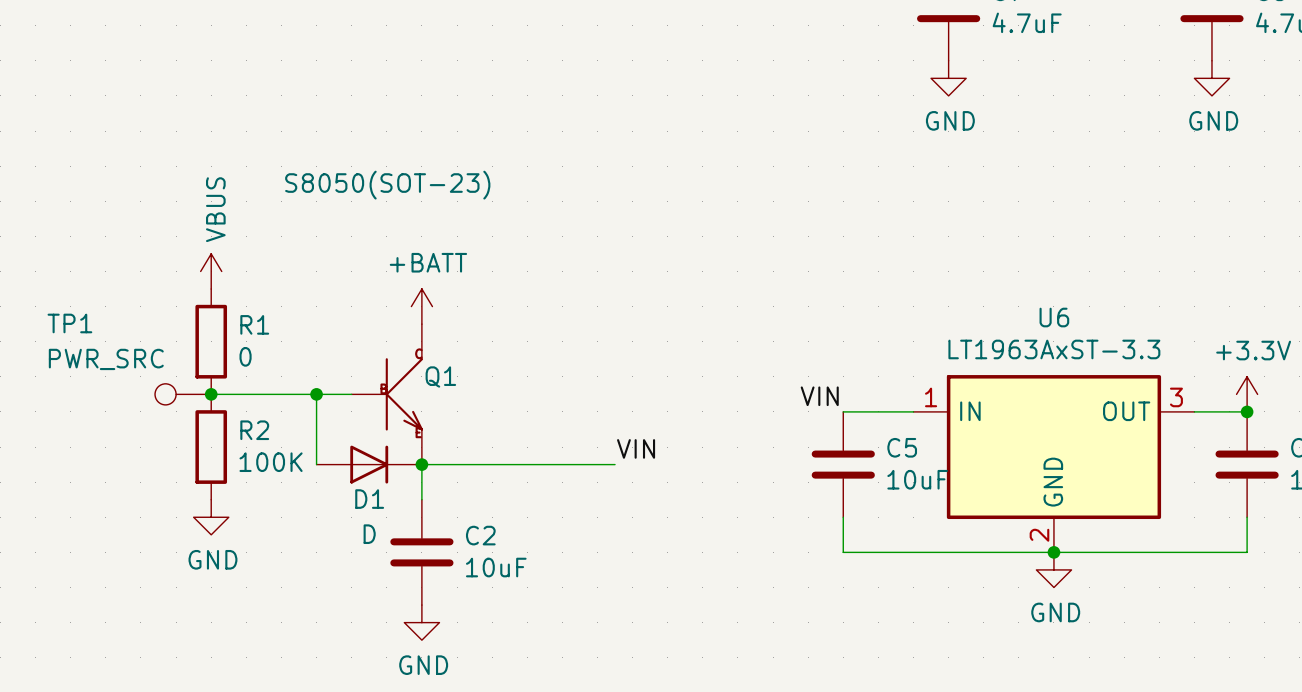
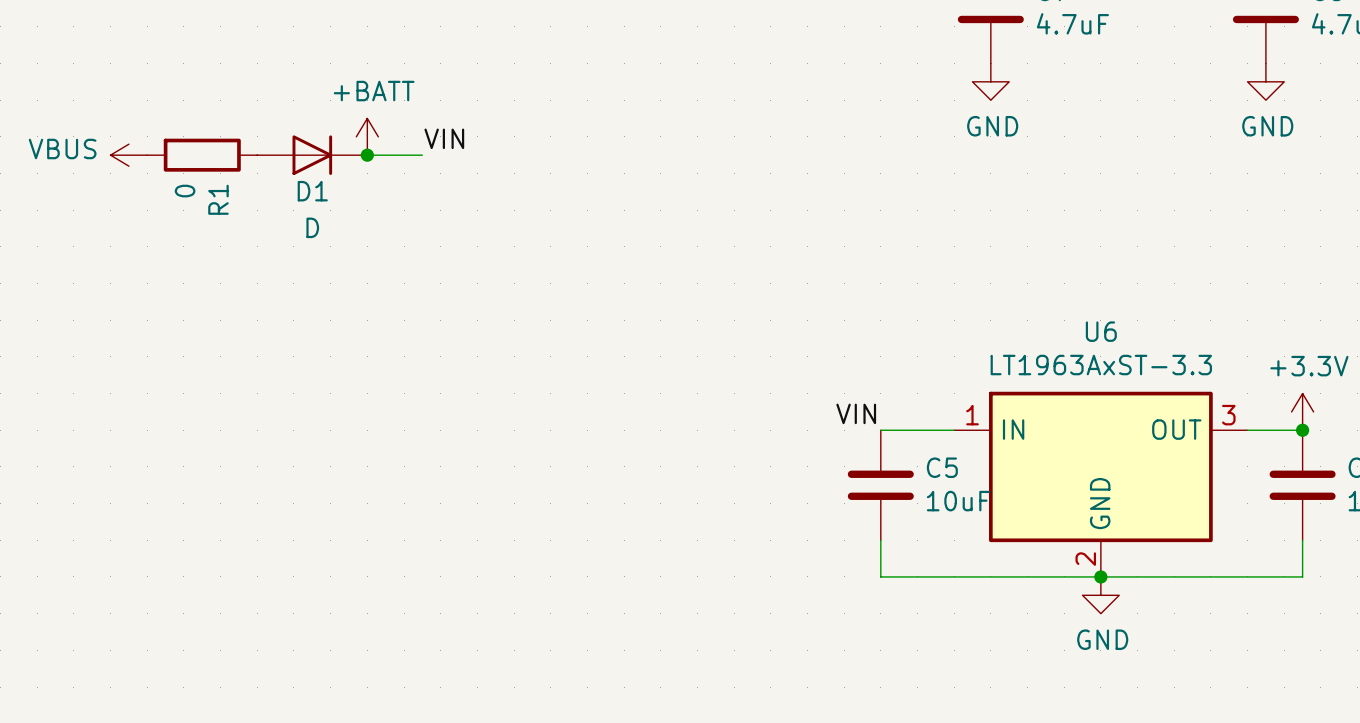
label: none -> VIN (444, 138)
wire: none -> (367, 155) (422, 155)
junction: none -> (367, 155)
power symbol rotation: 0° (211, 271) -> 90° counterclockwise (128, 155)
power symbol position: VBUS (211, 271) -> VBUS (128, 155)
power symbol position: +BATT (421, 306) -> +BATT (367, 136)
R1 rotation: 0° (211, 341) -> 90° clockwise (202, 155)
R1 position: (211, 341) -> (202, 155)
TP1: PWR_SRC (183, 394) -> none
wire: (211, 394) (351, 394) -> none
junction: (211, 394) -> none
wire: (316, 394) (316, 464) -> none
junction: (316, 394) -> none
Q1: S8050(SOT-23) (387, 394) -> none
R2: 100K (211, 447) -> none
label: VIN (636, 448) -> none
D1 position: (369, 464) -> (312, 155)
junction: (421, 464) -> none
wire: (615, 464) (421, 464) (421, 499) -> none
power symbol: GND (211, 517) -> none
C2: 10uF (421, 552) -> none
power symbol: GND (421, 622) -> none

